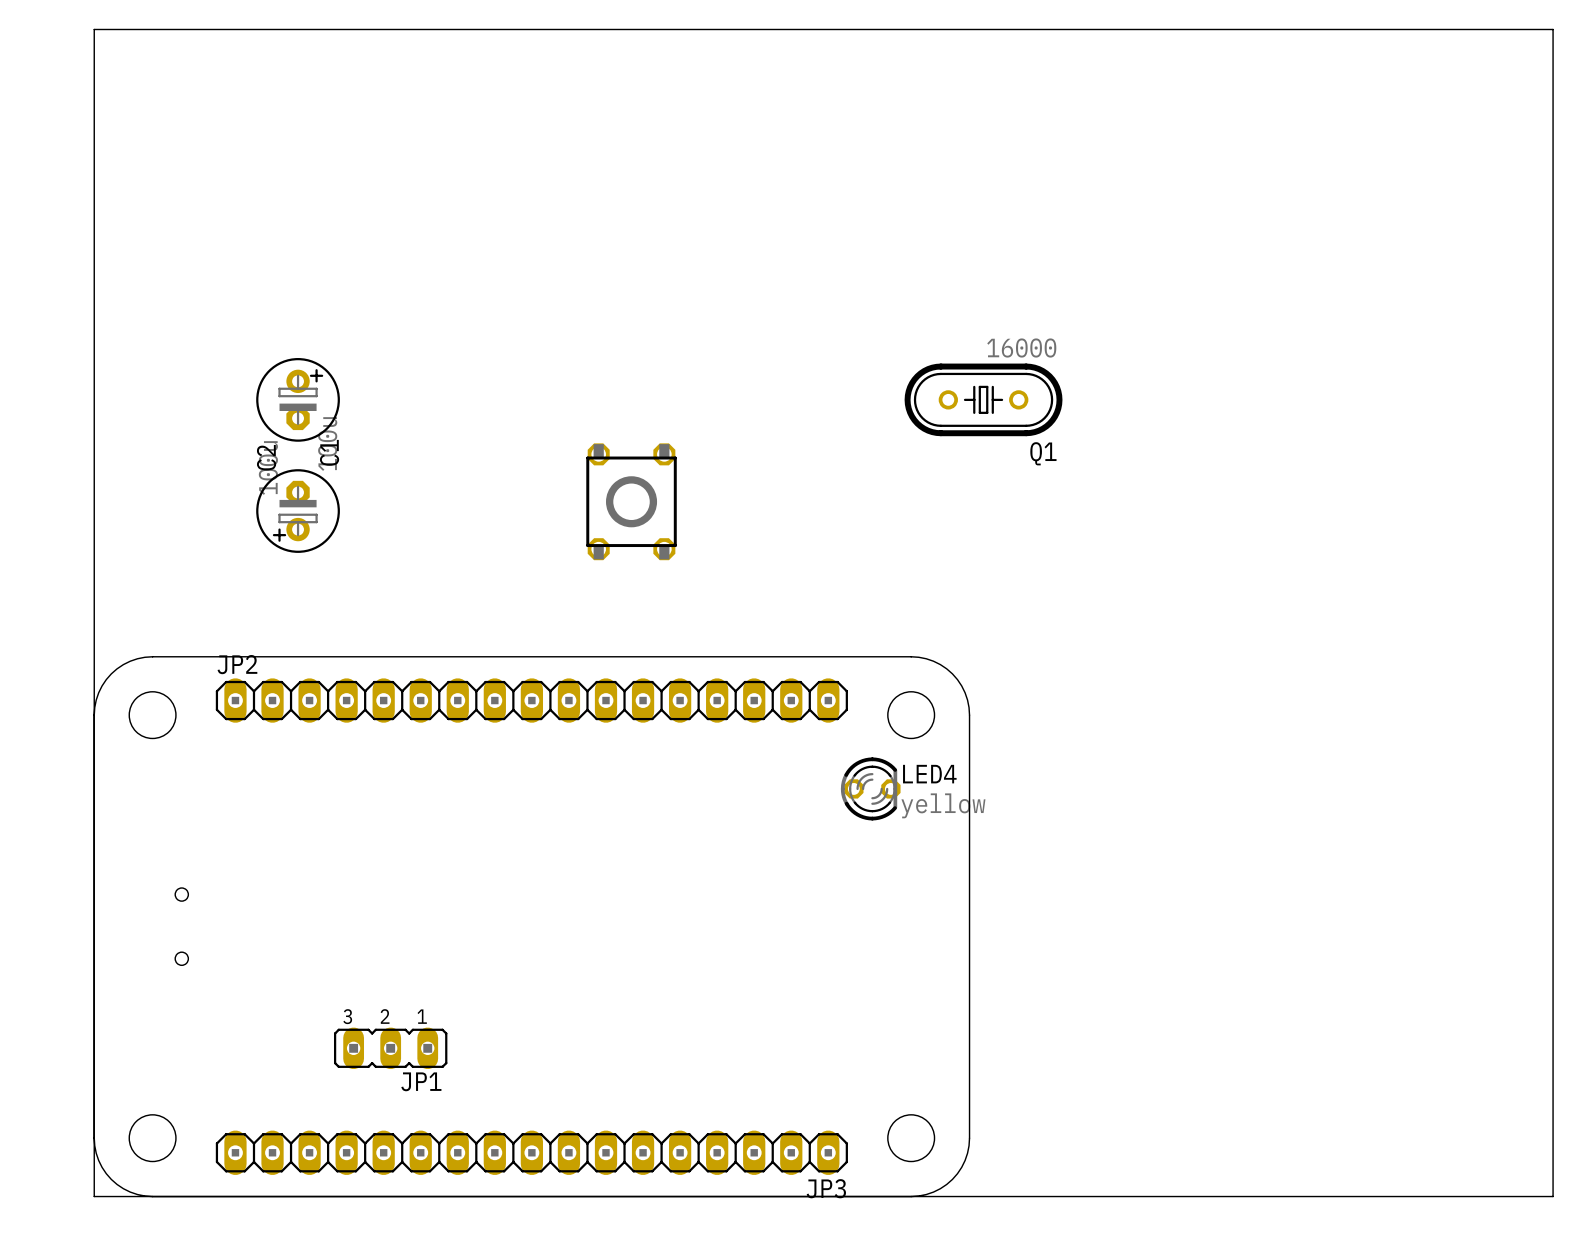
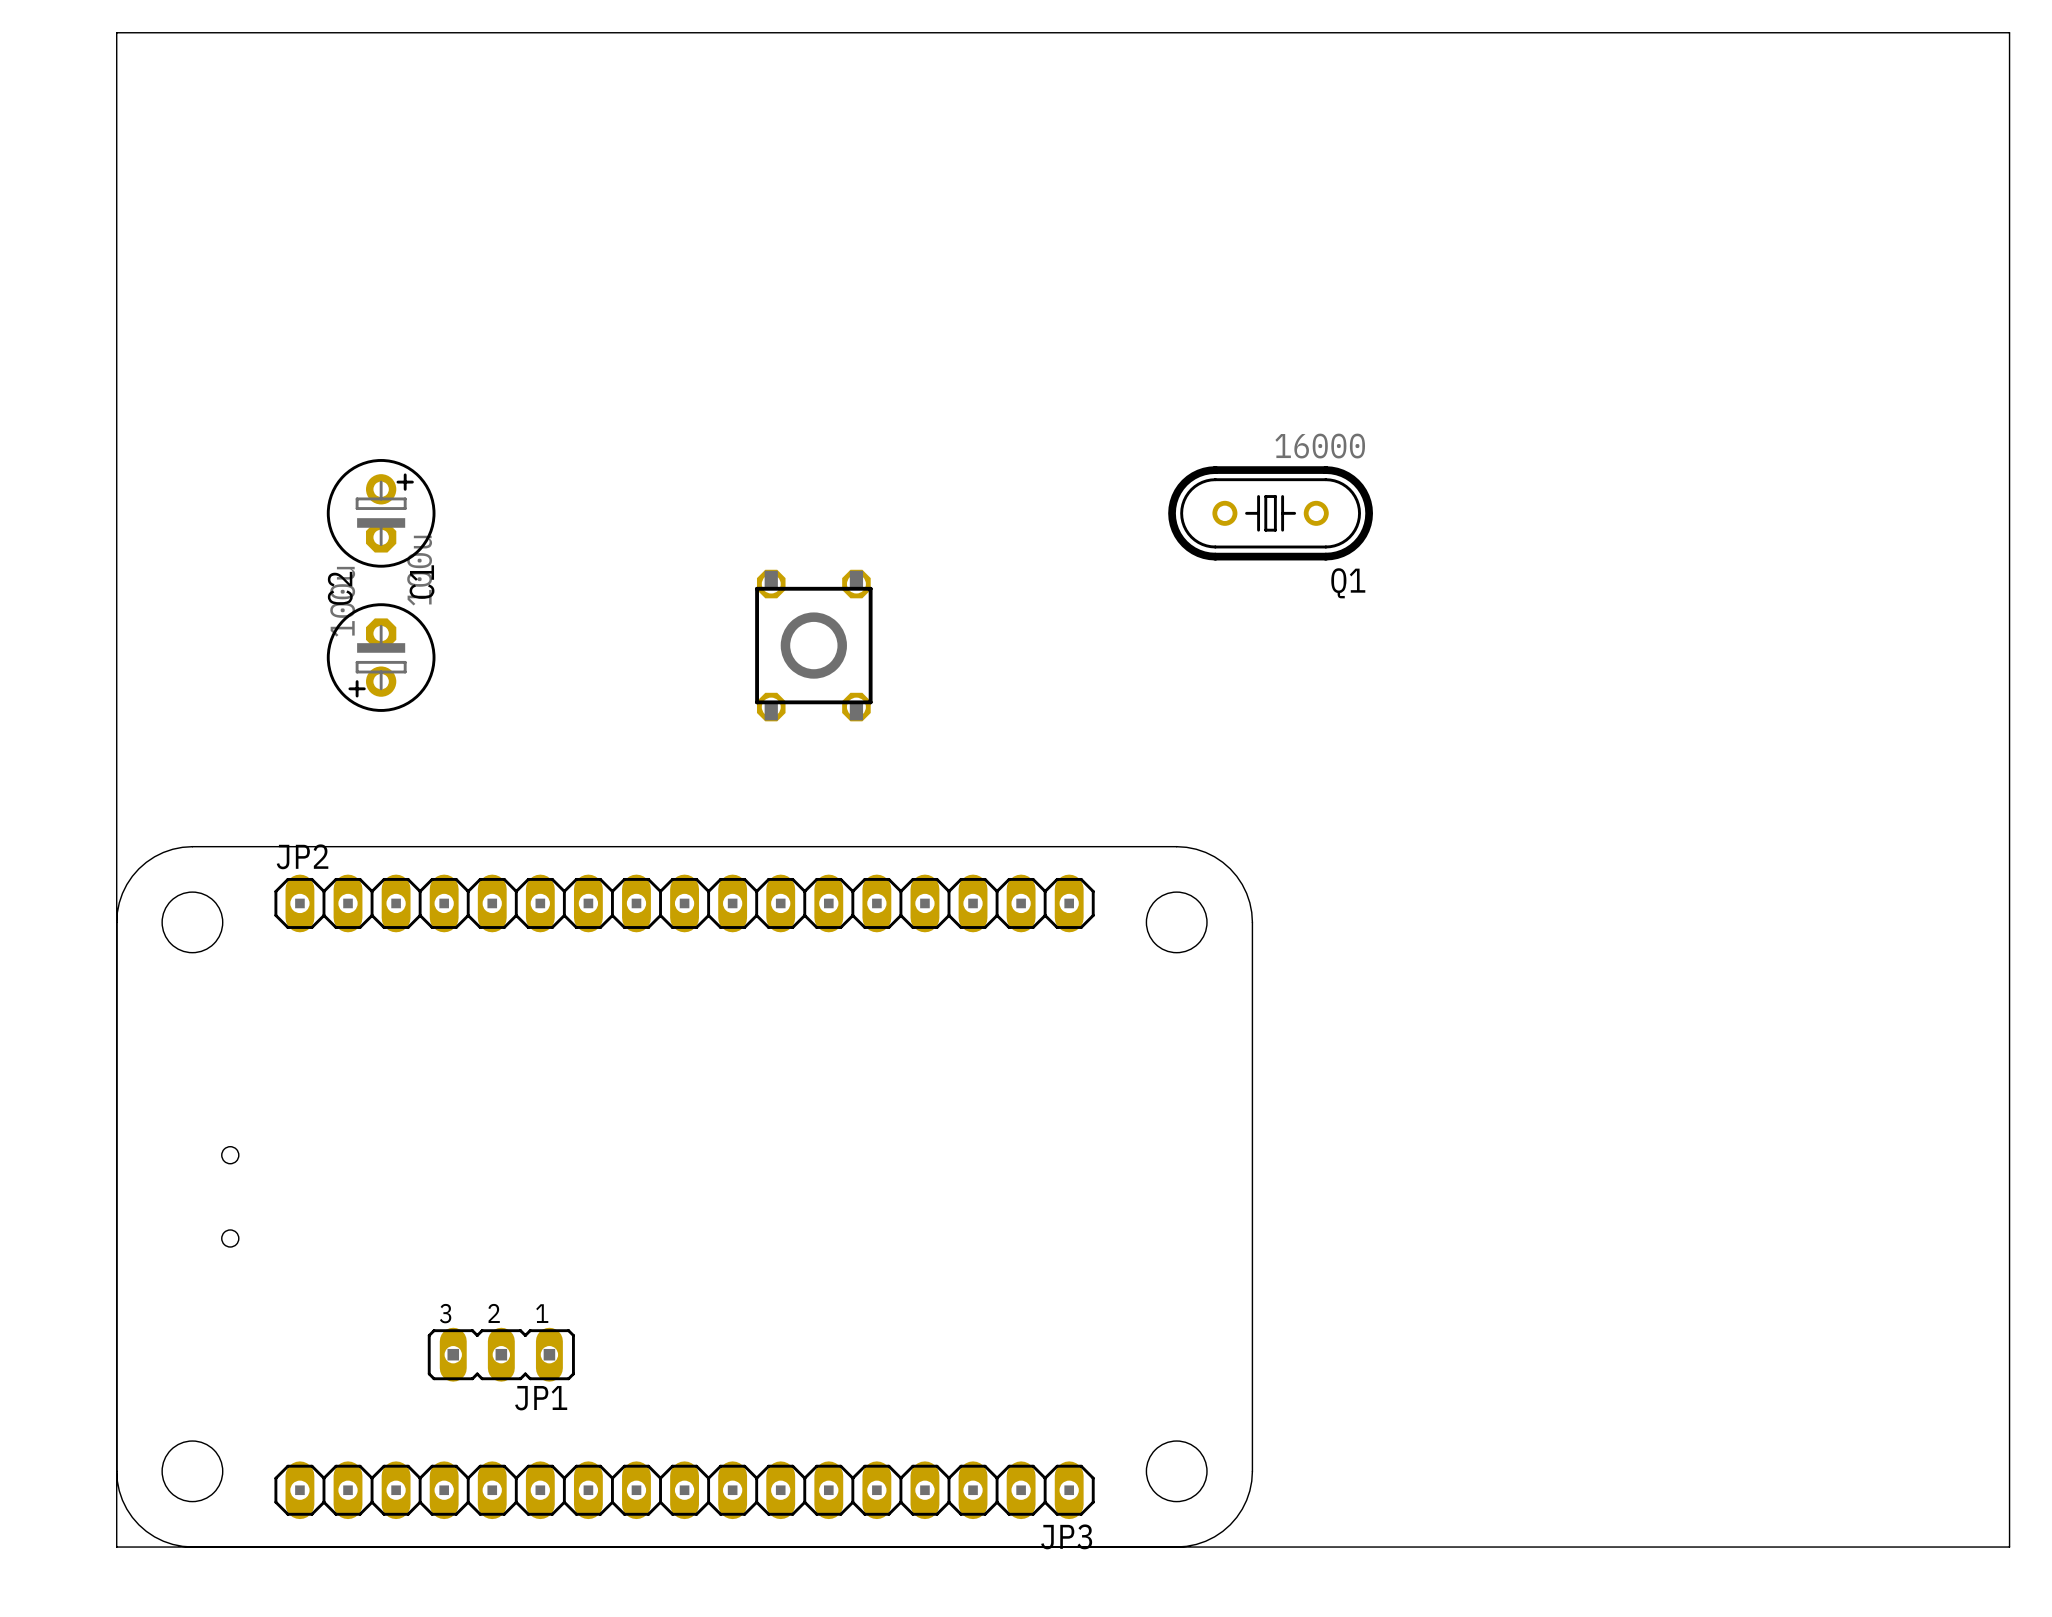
LED4: yellow (870, 788) -> none

